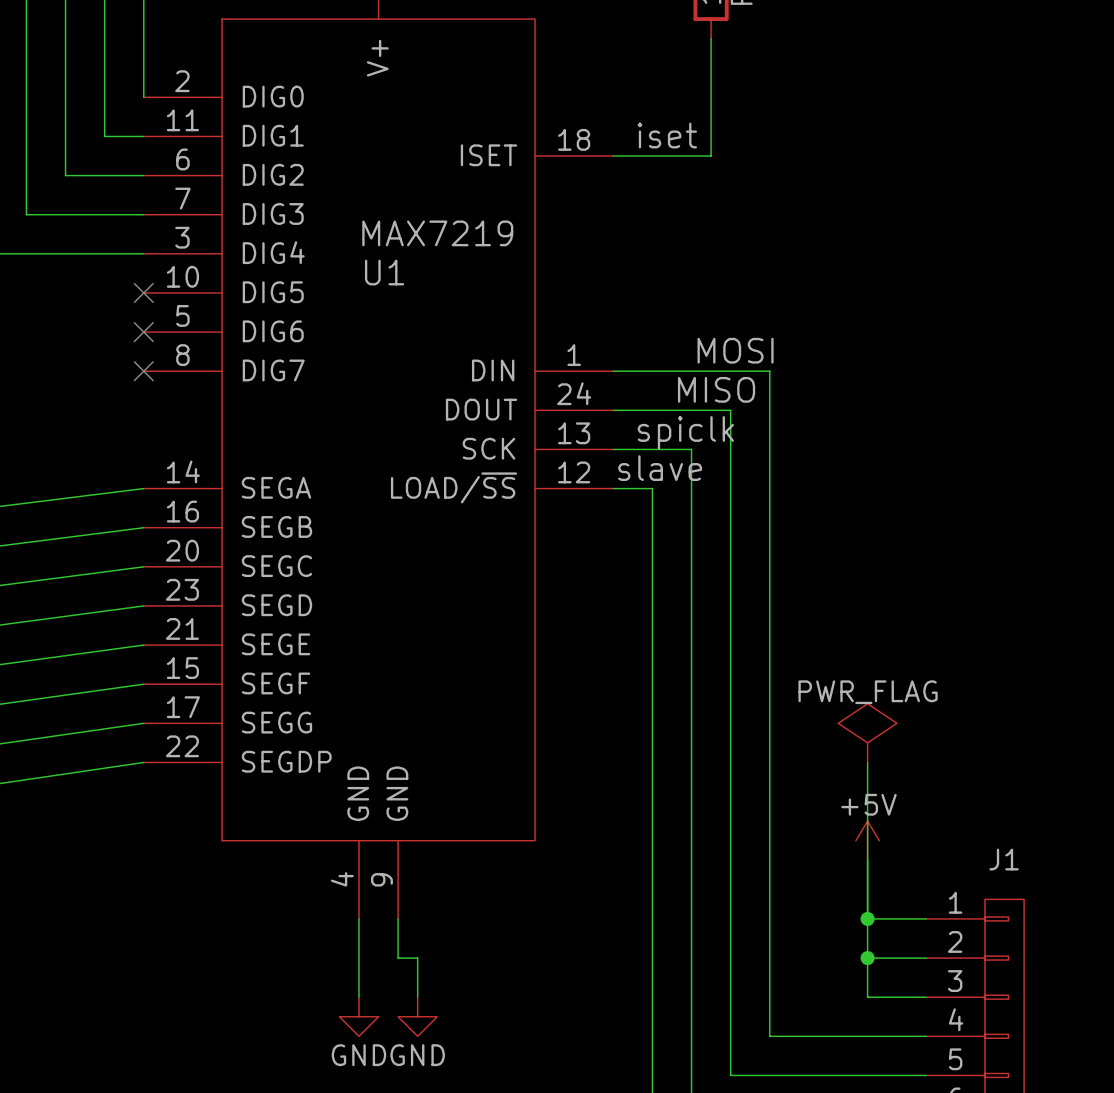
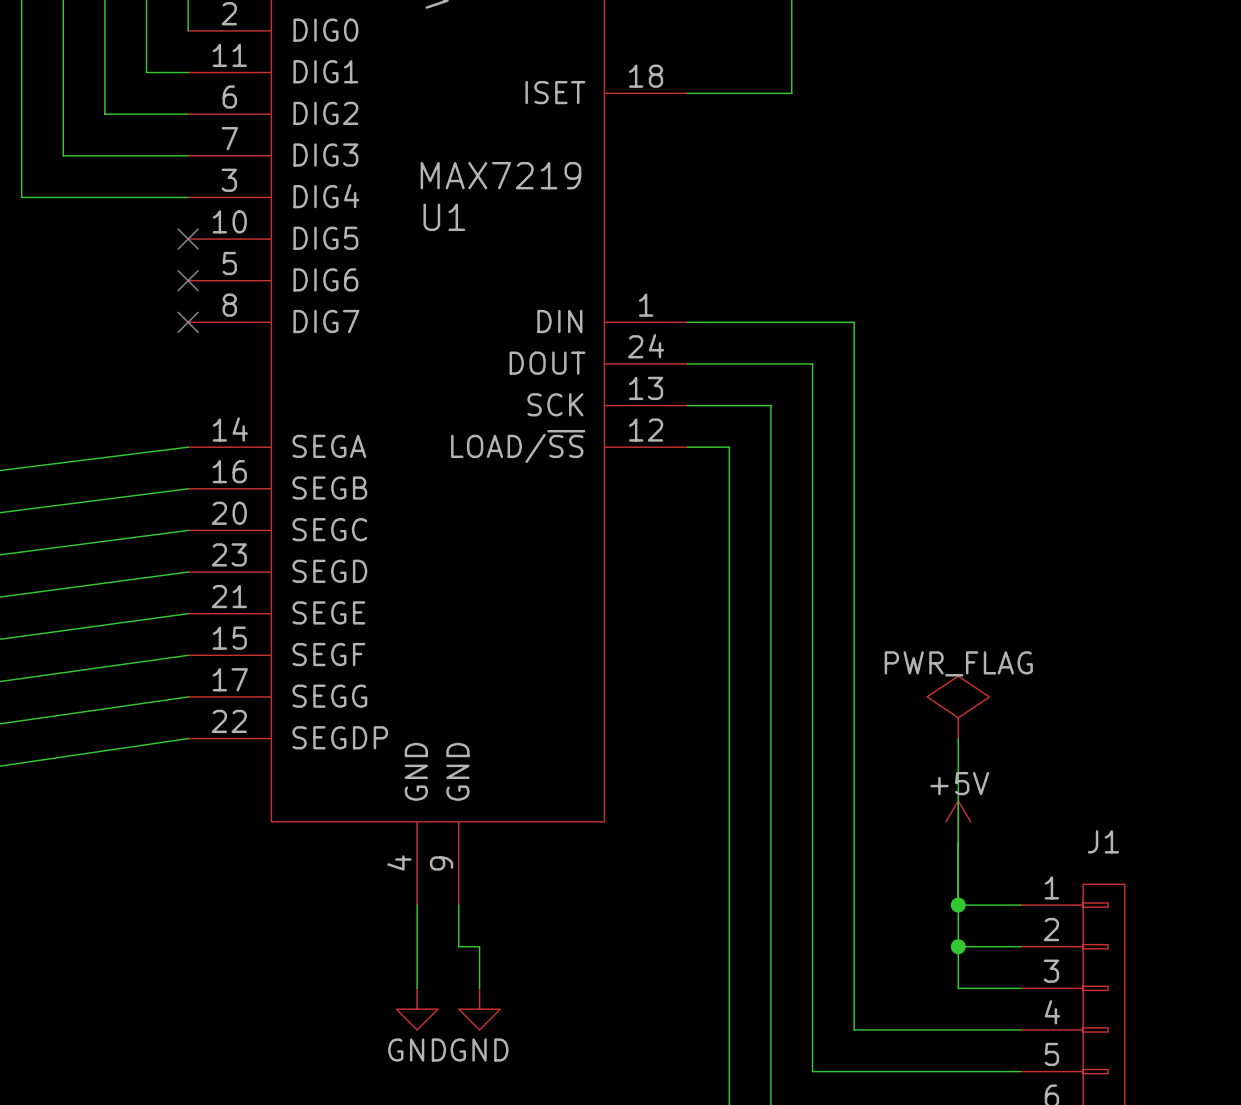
label: iset (667, 135) -> none
label: MOSI (735, 350) -> none
label: MISO (716, 389) -> none
label: spiclk (685, 432) -> none
label: slave (660, 468) -> none

